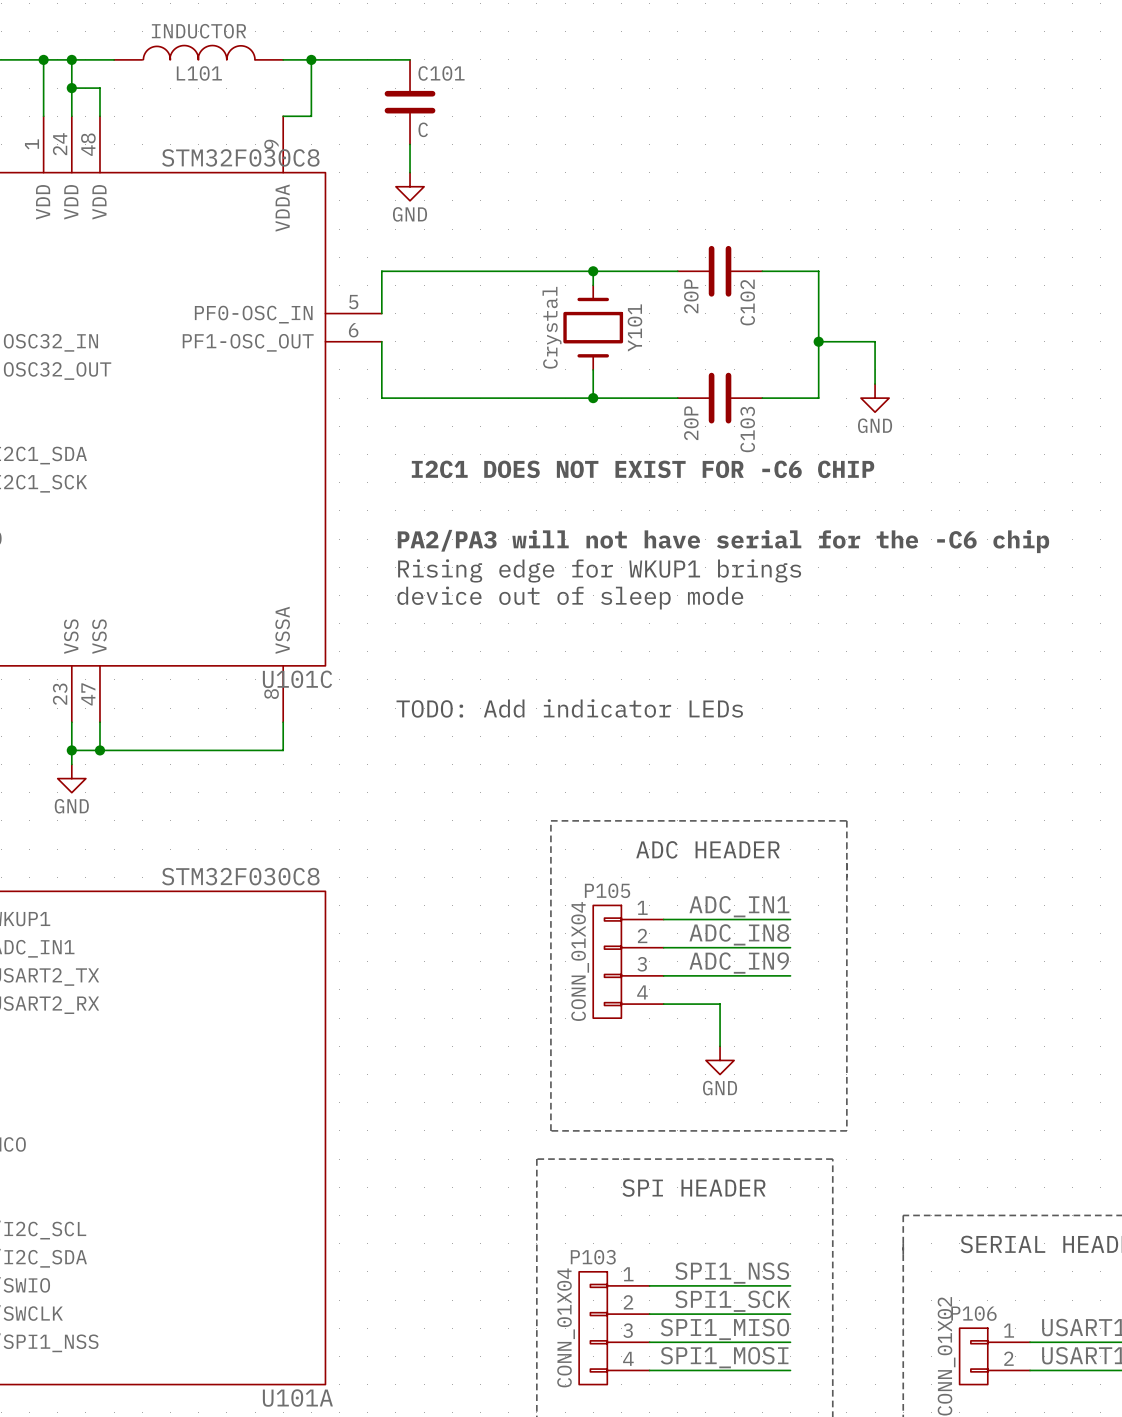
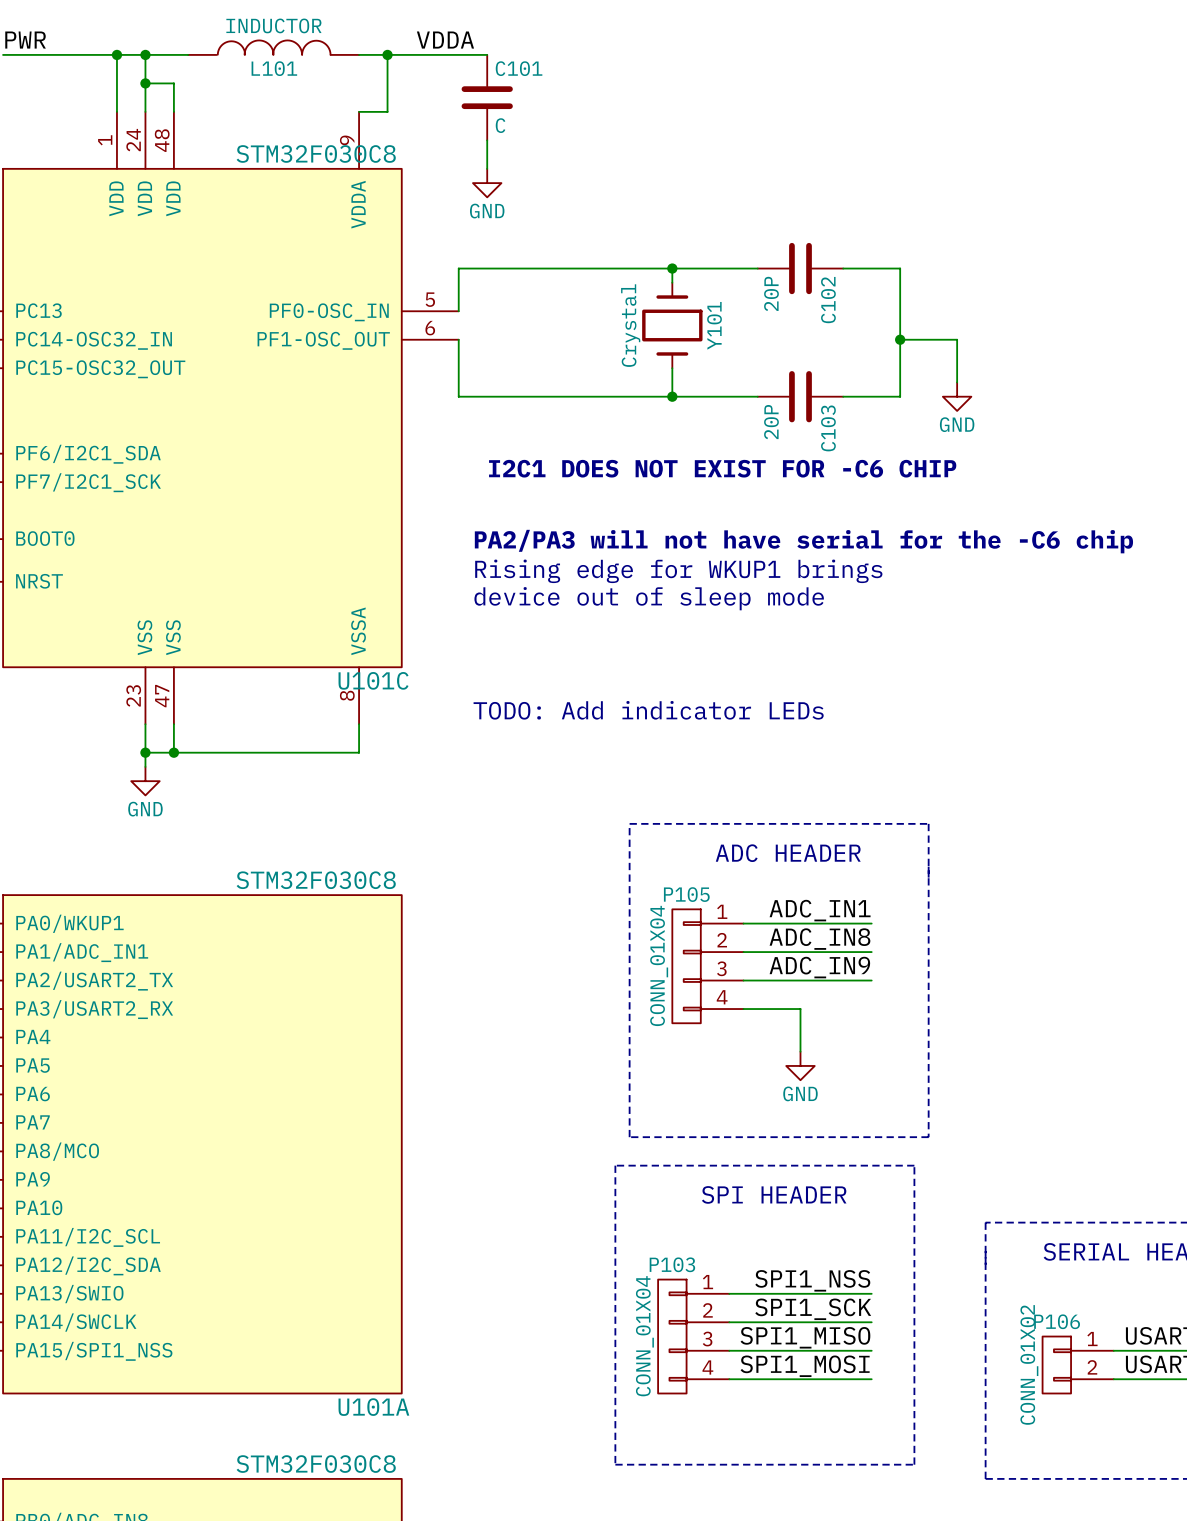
label: none -> VDDA (445, 40)

